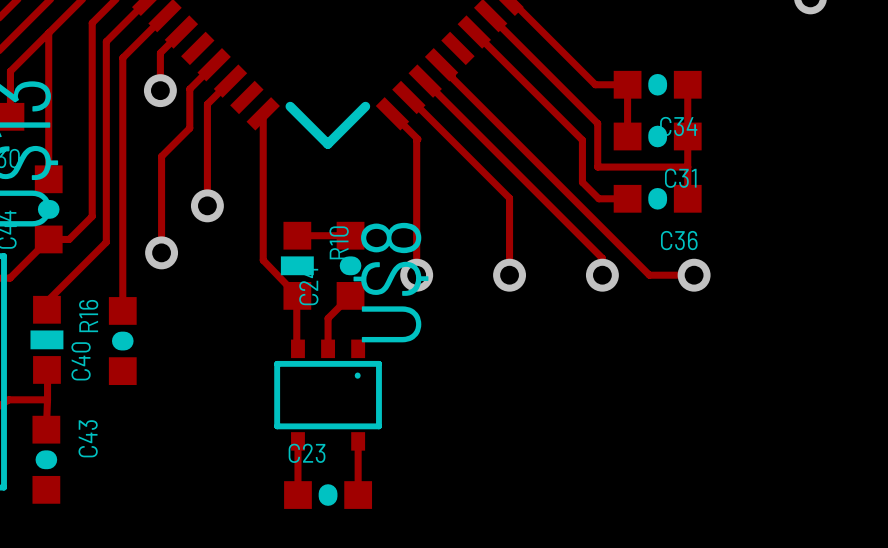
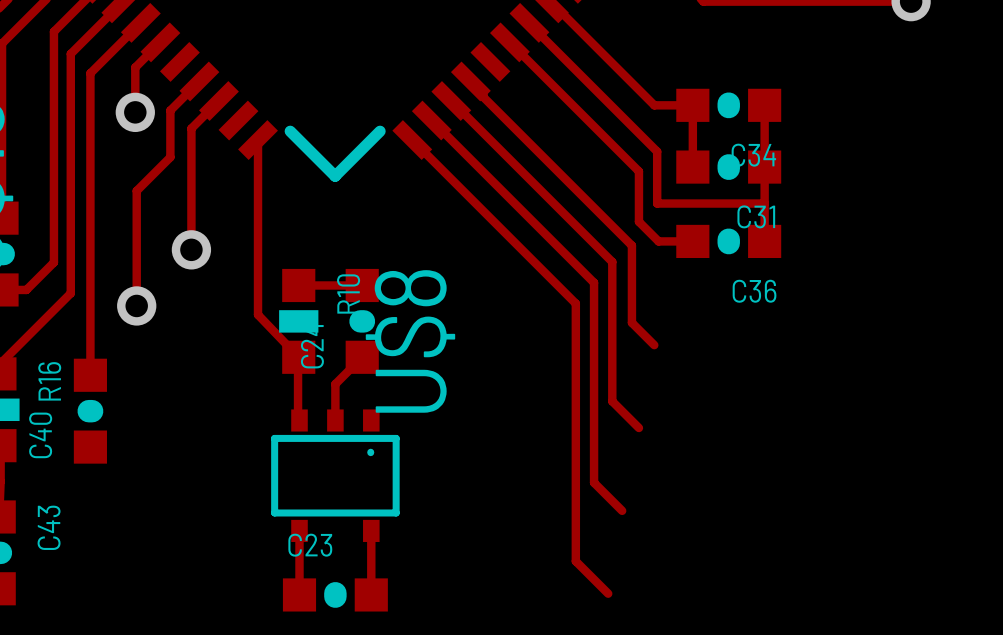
track: (417, 139) (416, 275) -> (442, 170) (575, 303) (575, 561) (608, 593)
track: (509, 198) (509, 275) -> (551, 240) (594, 282) (594, 482) (622, 510)
track: (576, 202) (649, 275) (694, 275) -> (631, 245) (631, 322) (654, 345)
track: (560, 215) (602, 258) (602, 275) -> (612, 261) (612, 401) (638, 428)
via: (416, 275) -> none
via: (509, 275) -> none
via: (602, 275) -> none
via: (694, 275) -> none

